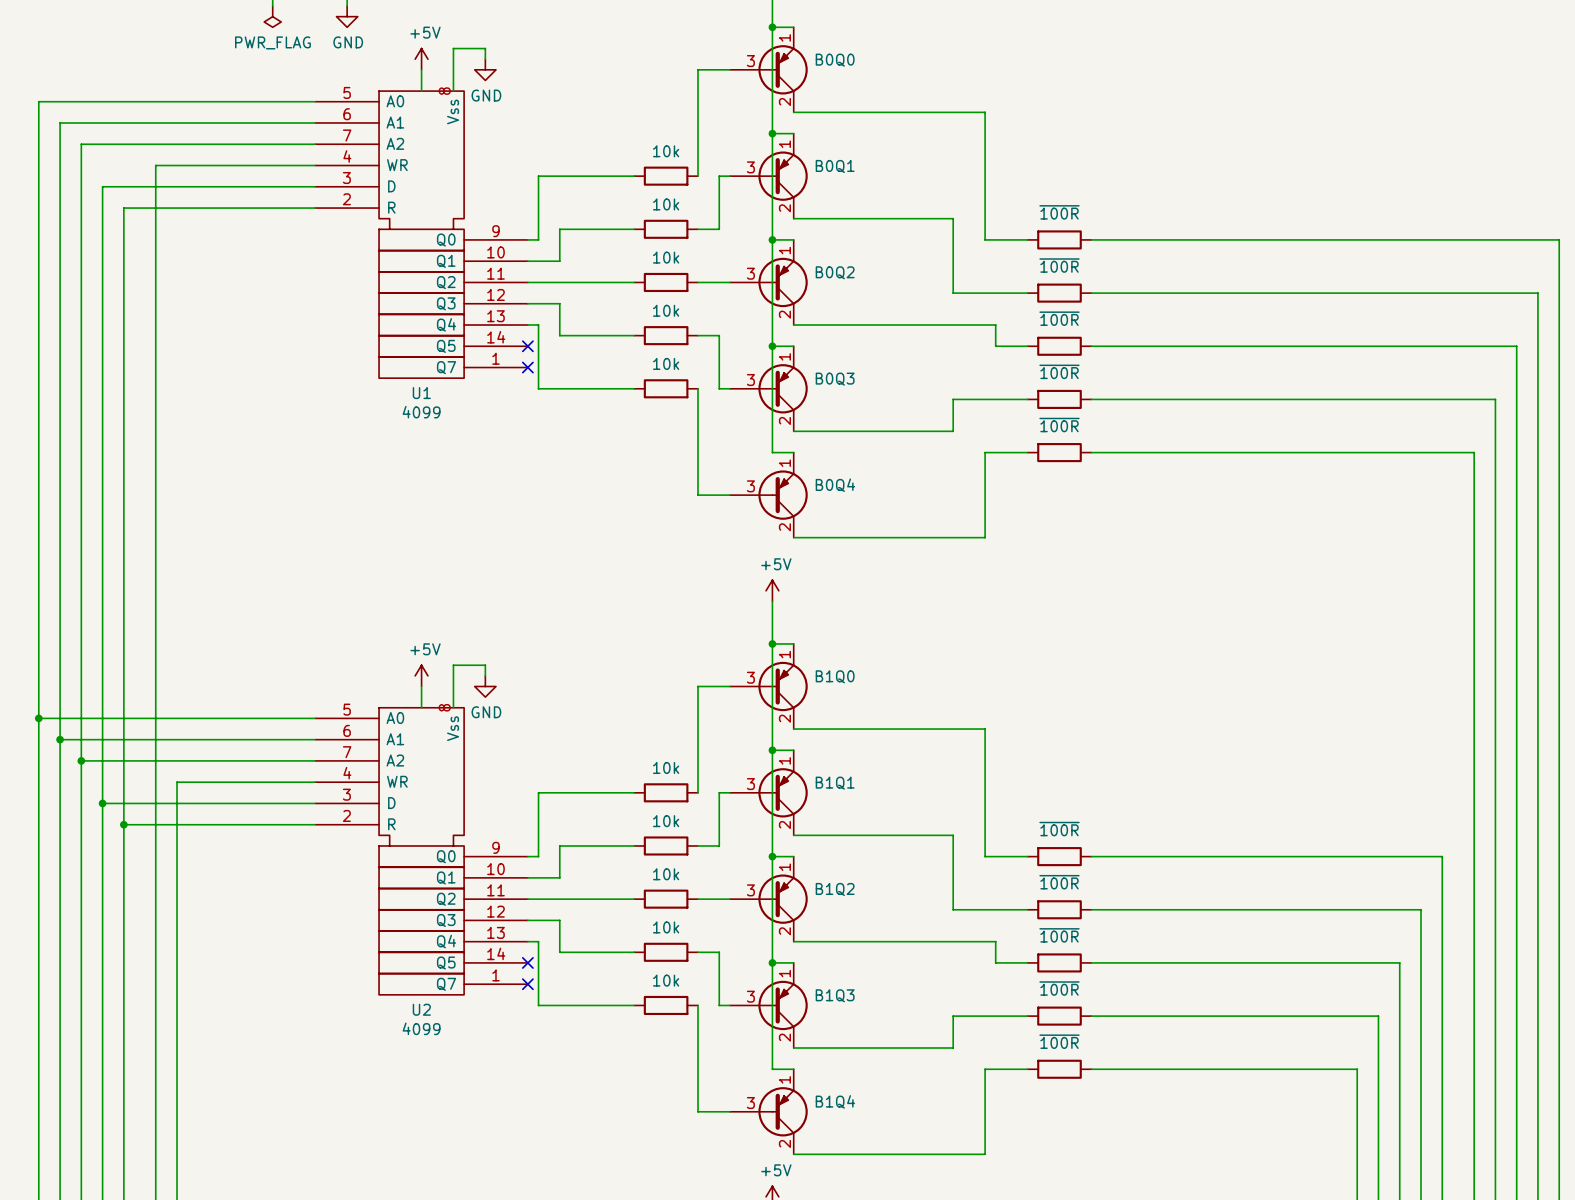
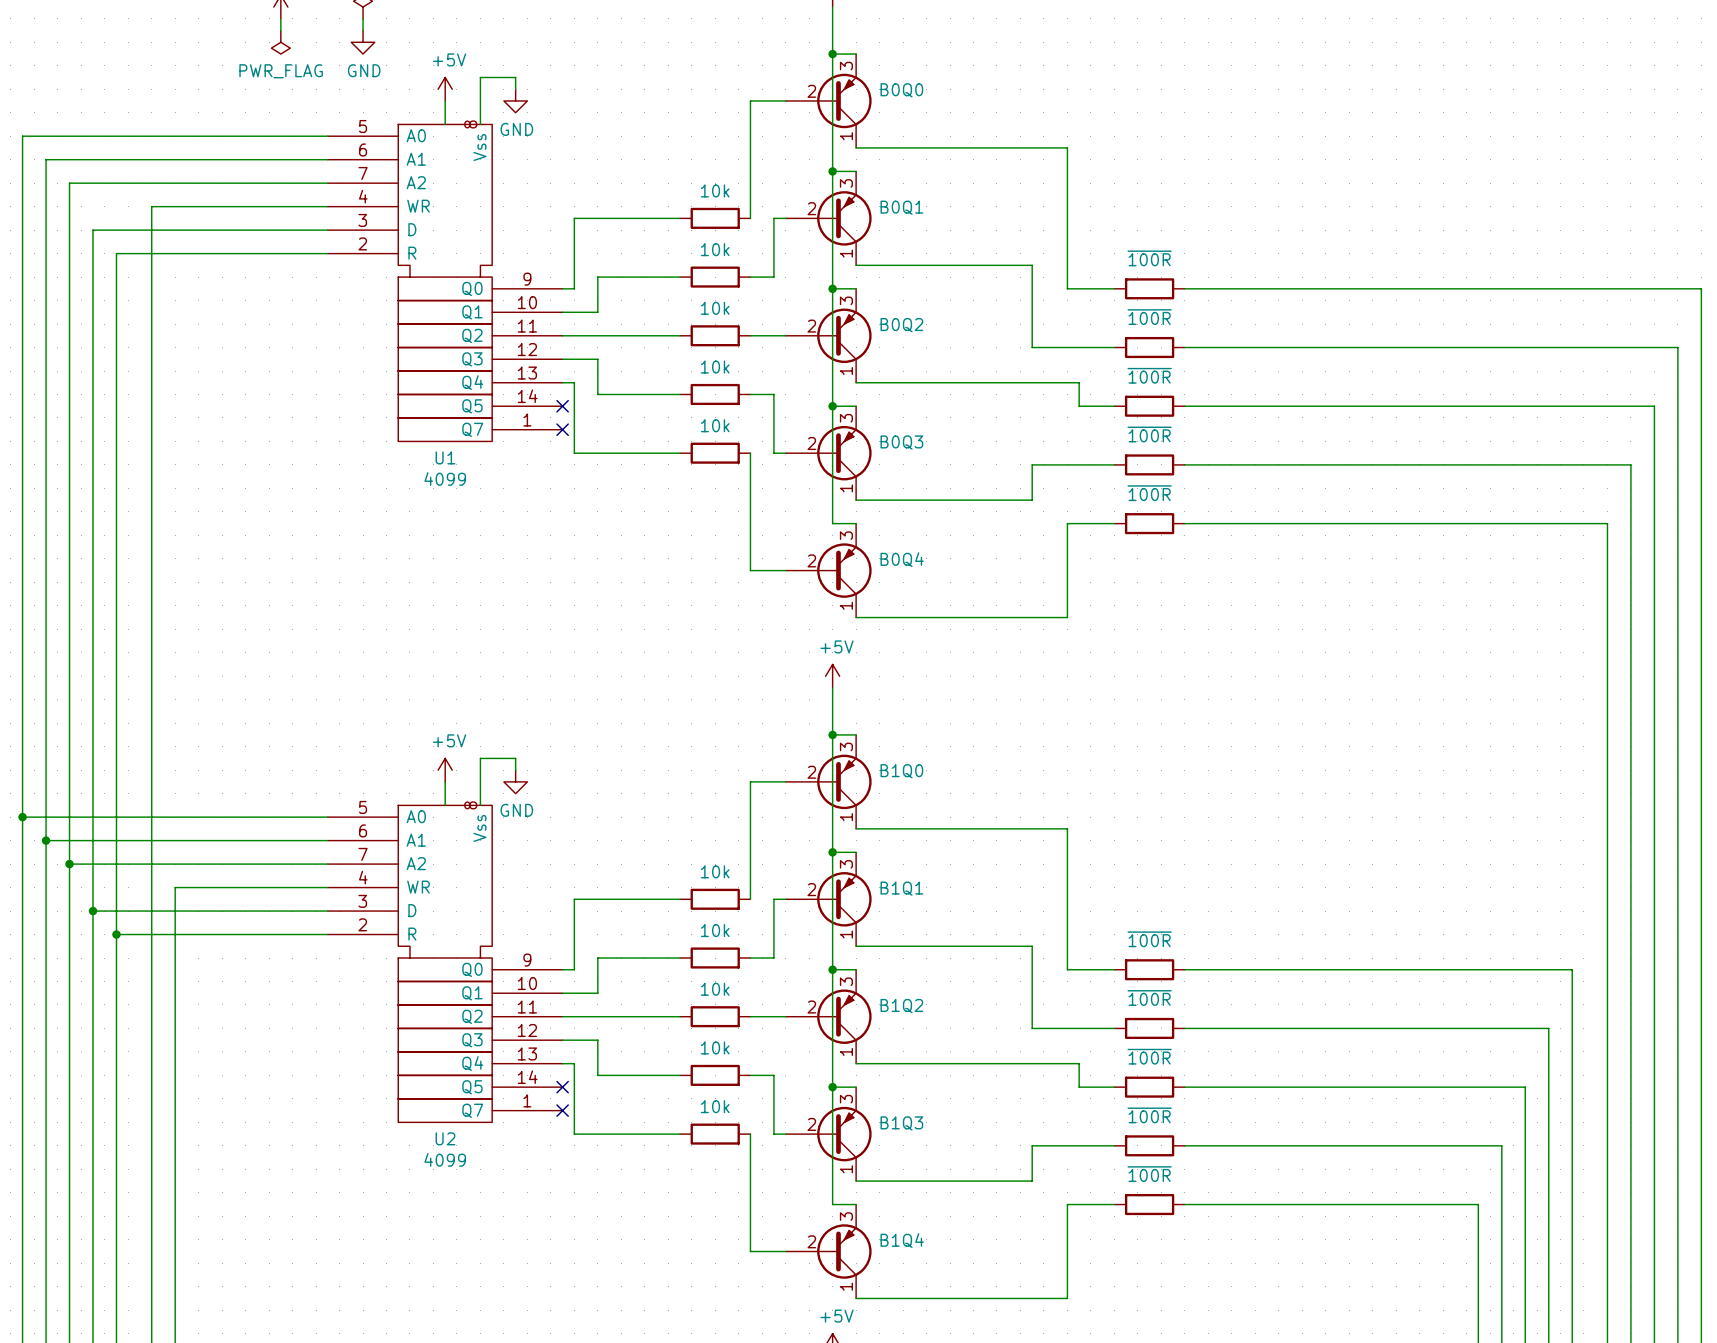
B0Q0 symbol: [729, 27, 808, 113] -> [785, 54, 872, 148]
B0Q1 symbol: [729, 133, 808, 219] -> [785, 171, 872, 266]
B0Q2 symbol: [729, 239, 808, 326] -> [785, 288, 872, 383]
B0Q3 symbol: [729, 346, 808, 432] -> [785, 406, 872, 501]
B0Q4 symbol: [729, 452, 808, 538] -> [785, 523, 872, 618]
B1Q0 symbol: [729, 643, 808, 730] -> [785, 734, 872, 829]
B1Q1 symbol: [729, 750, 808, 836] -> [785, 852, 872, 947]
B1Q2 symbol: [729, 856, 808, 942] -> [785, 969, 872, 1064]
B1Q3 symbol: [729, 962, 808, 1049] -> [785, 1087, 872, 1182]
B1Q4 symbol: [729, 1069, 808, 1155] -> [785, 1204, 872, 1299]

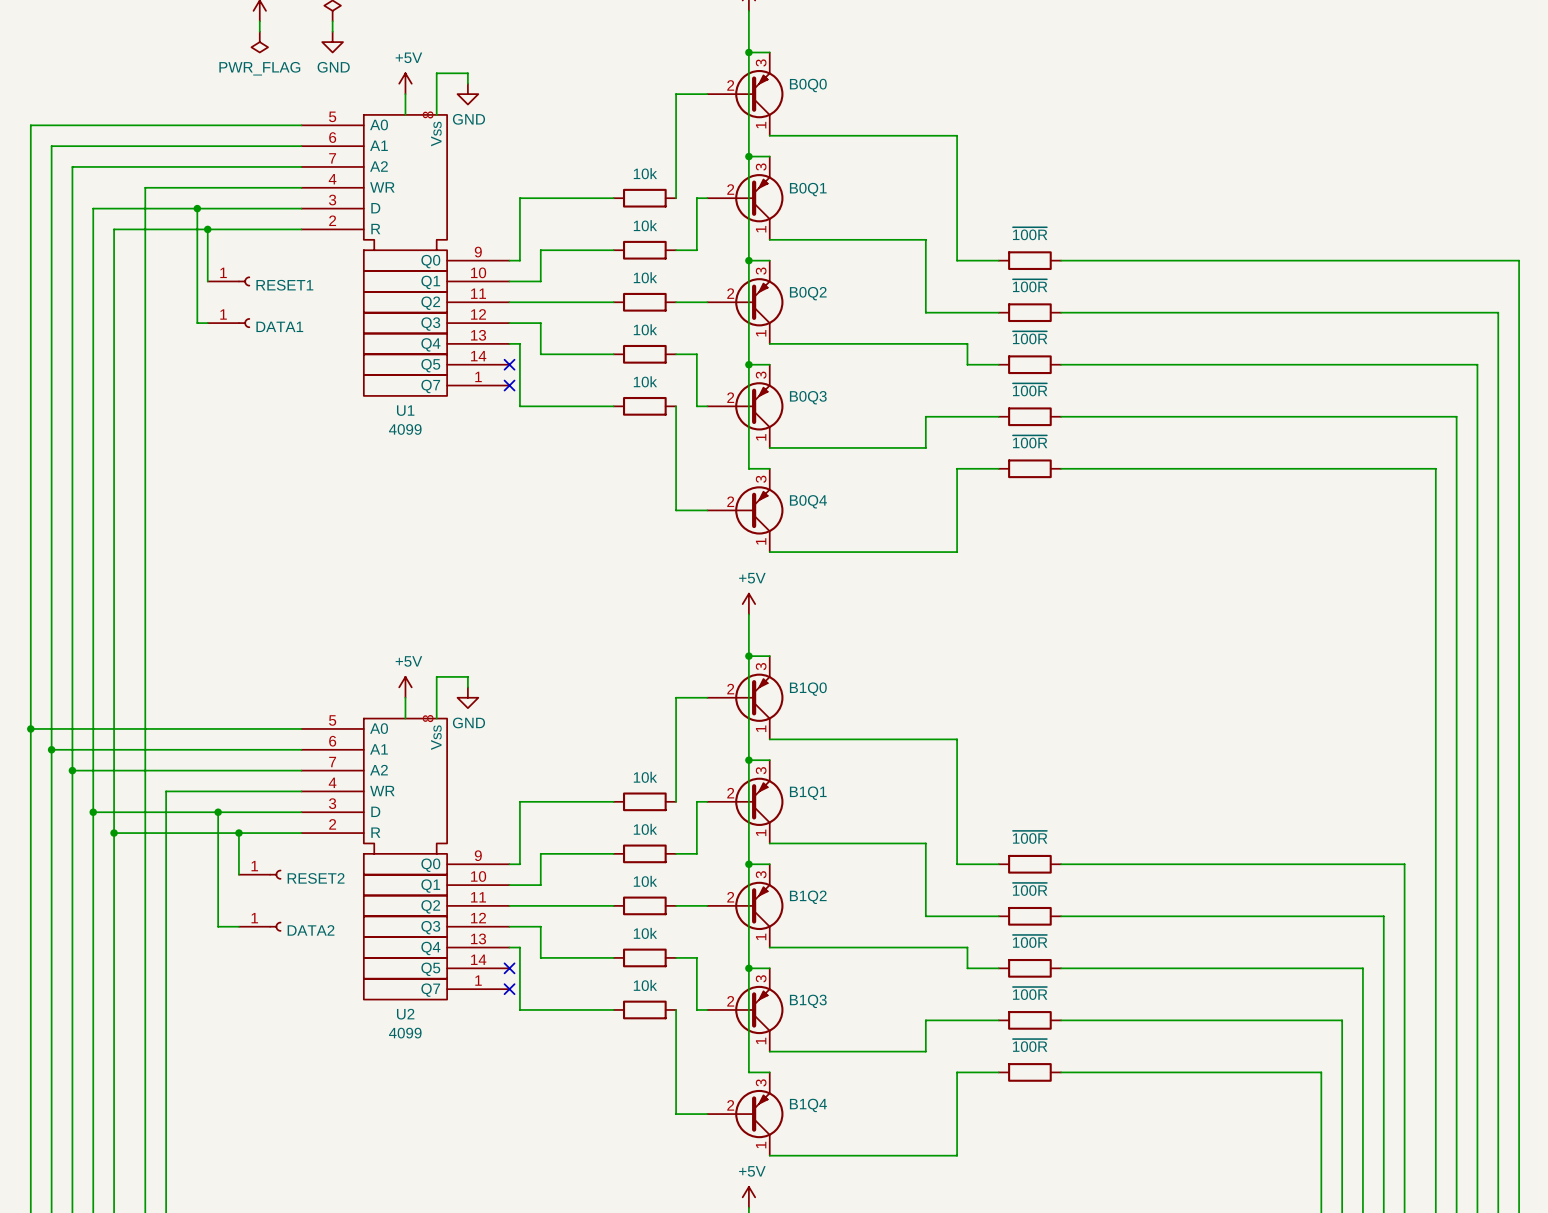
wire: none -> (197, 208) (197, 323) (207, 323)
junction: none -> (197, 208)
wire: none -> (207, 229) (207, 281)
junction: none -> (207, 229)
RESET1: none -> (228, 281)
DATA1: none -> (228, 323)
wire: none -> (218, 812) (218, 926) (238, 926)
junction: none -> (218, 812)
wire: none -> (238, 833) (238, 874)
junction: none -> (238, 833)
RESET2: none -> (260, 874)
DATA2: none -> (260, 926)

